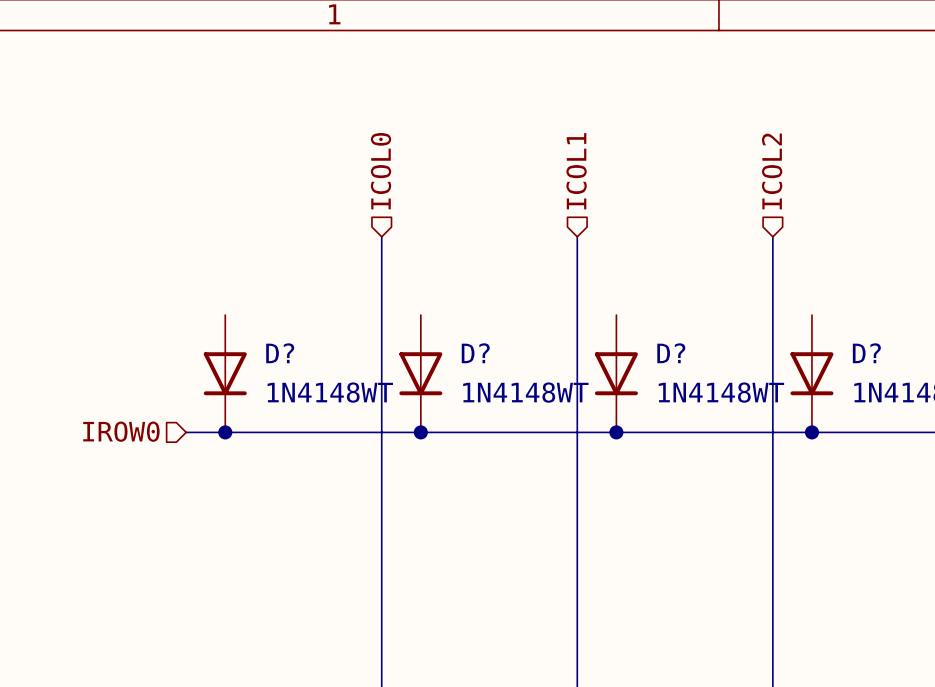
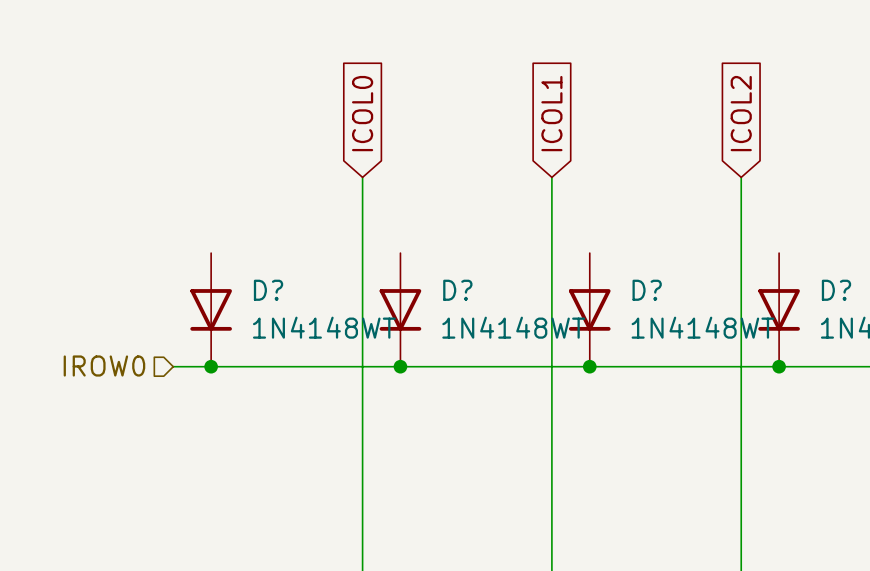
hierarchical label: ICOL0 (381, 171) -> none
hierarchical label: ICOL1 (576, 171) -> none
hierarchical label: ICOL2 (772, 171) -> none
global label: none -> ICOL0 (362, 113)
global label: none -> ICOL1 (551, 113)
global label: none -> ICOL2 (741, 113)

